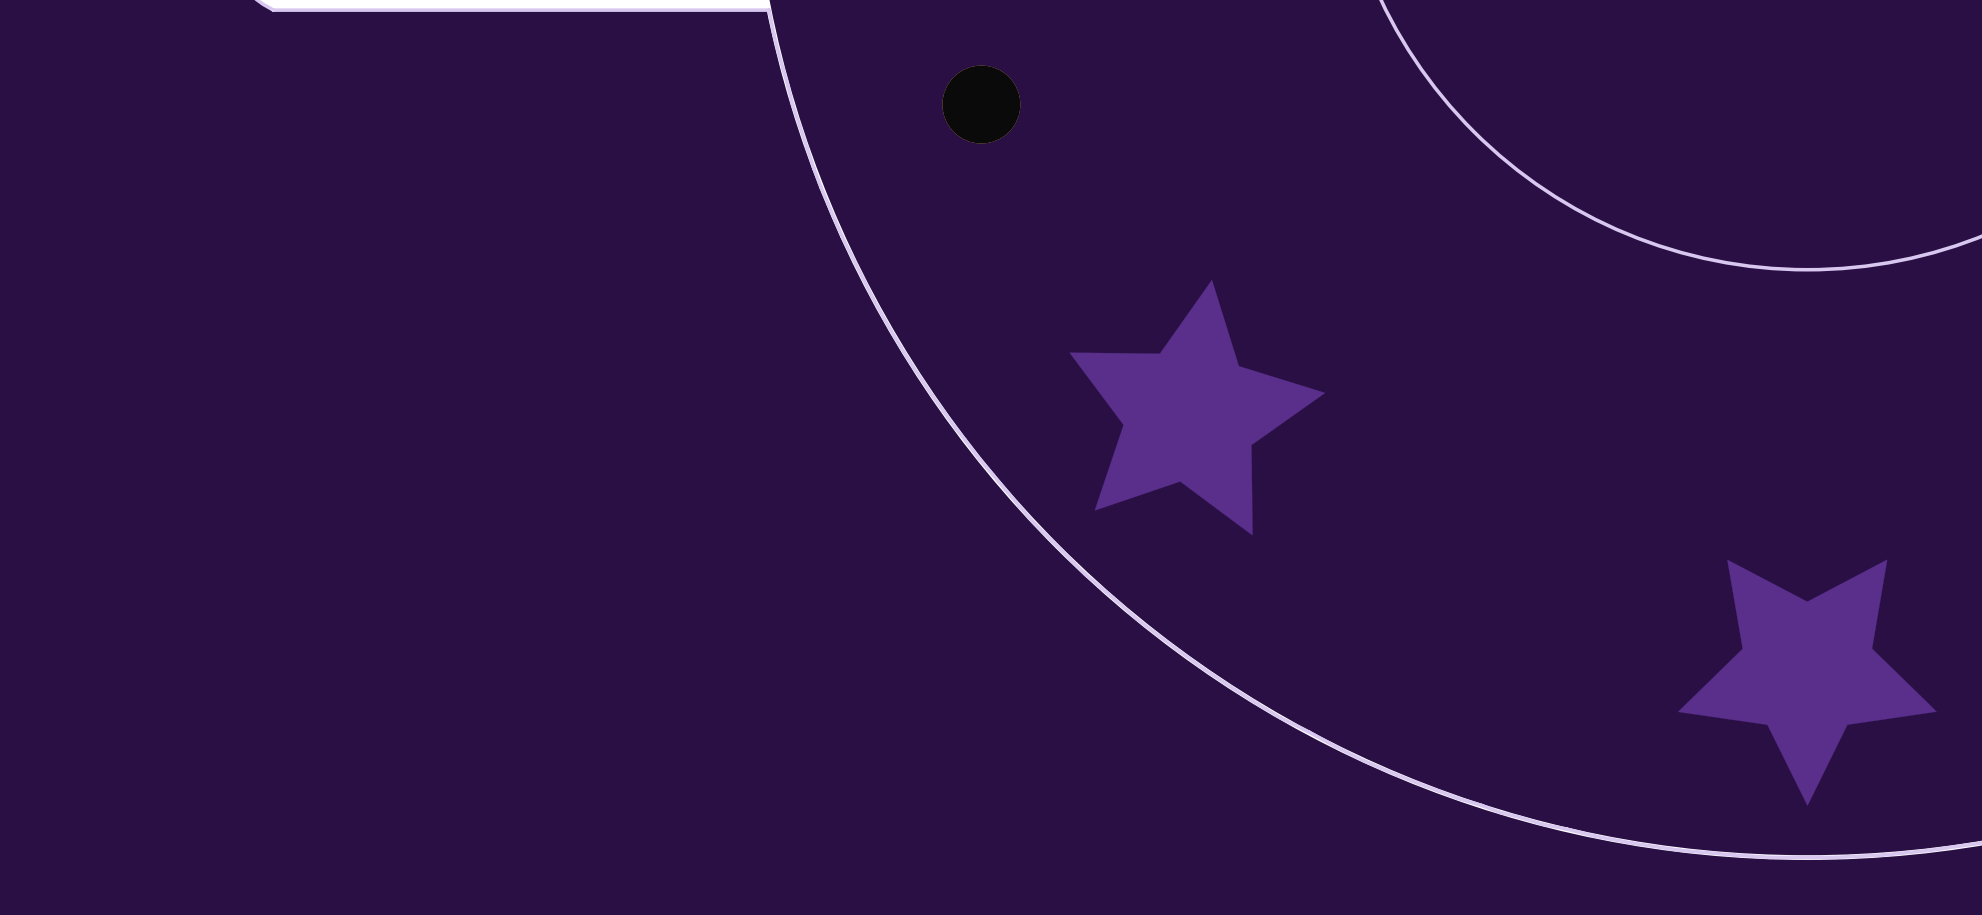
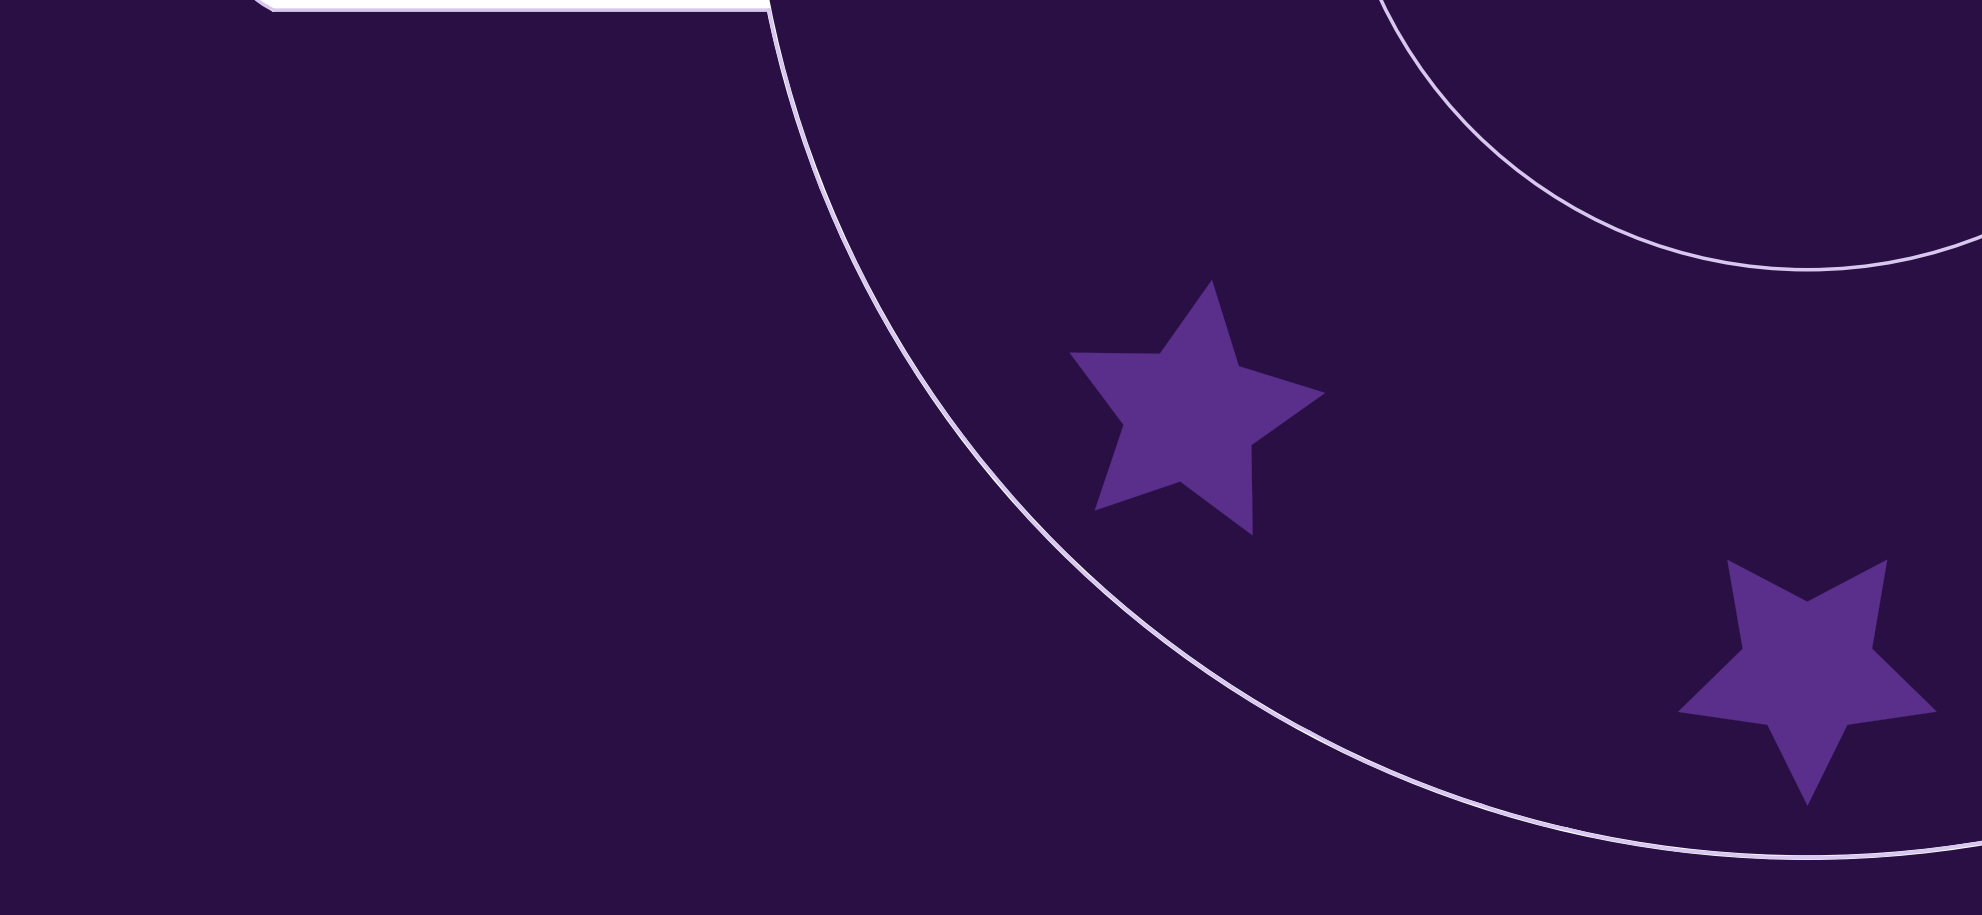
part: (981, 104) -> none

